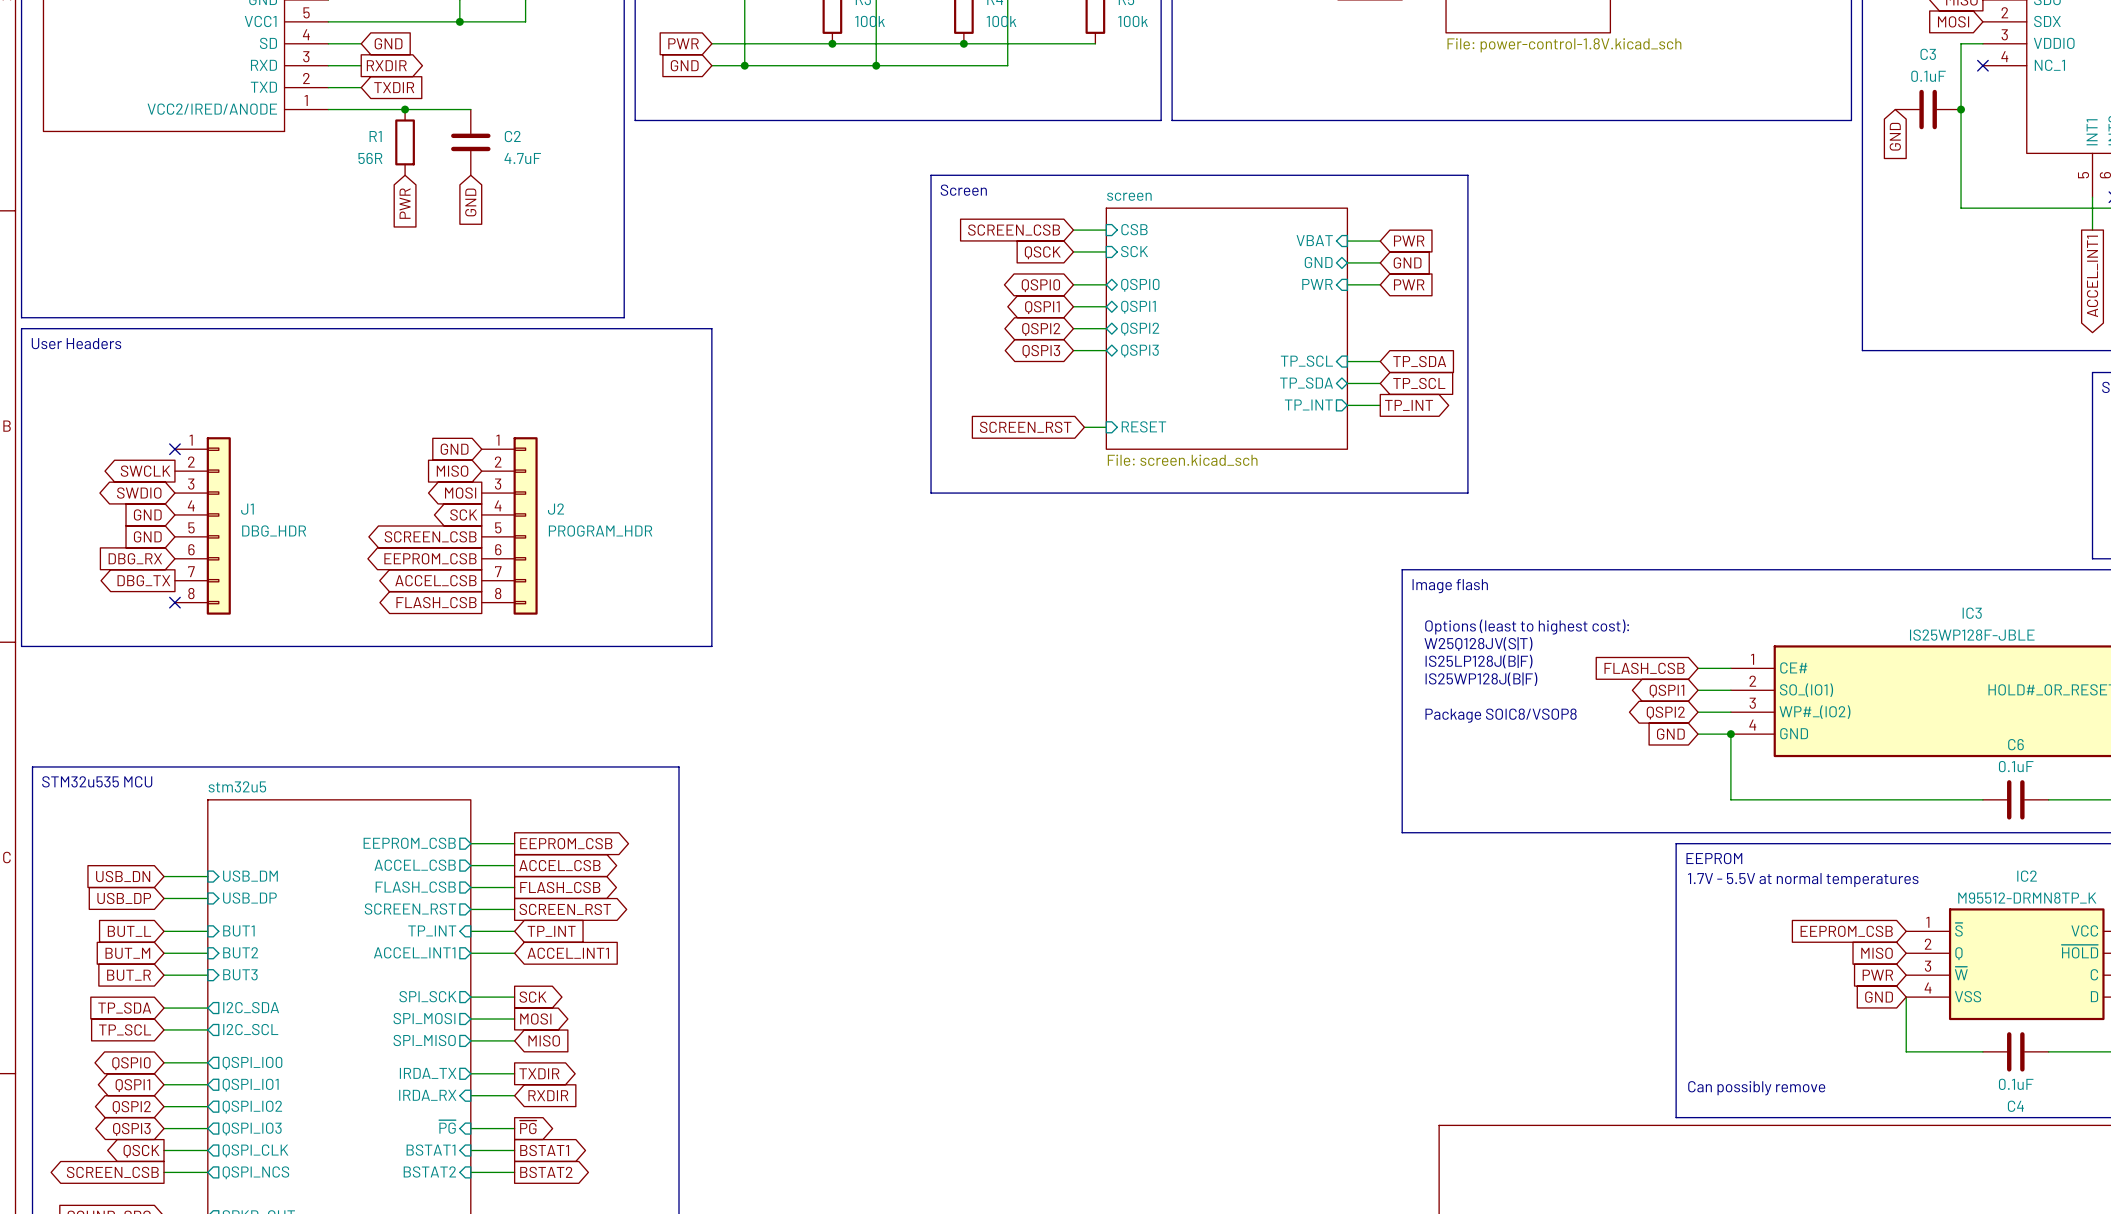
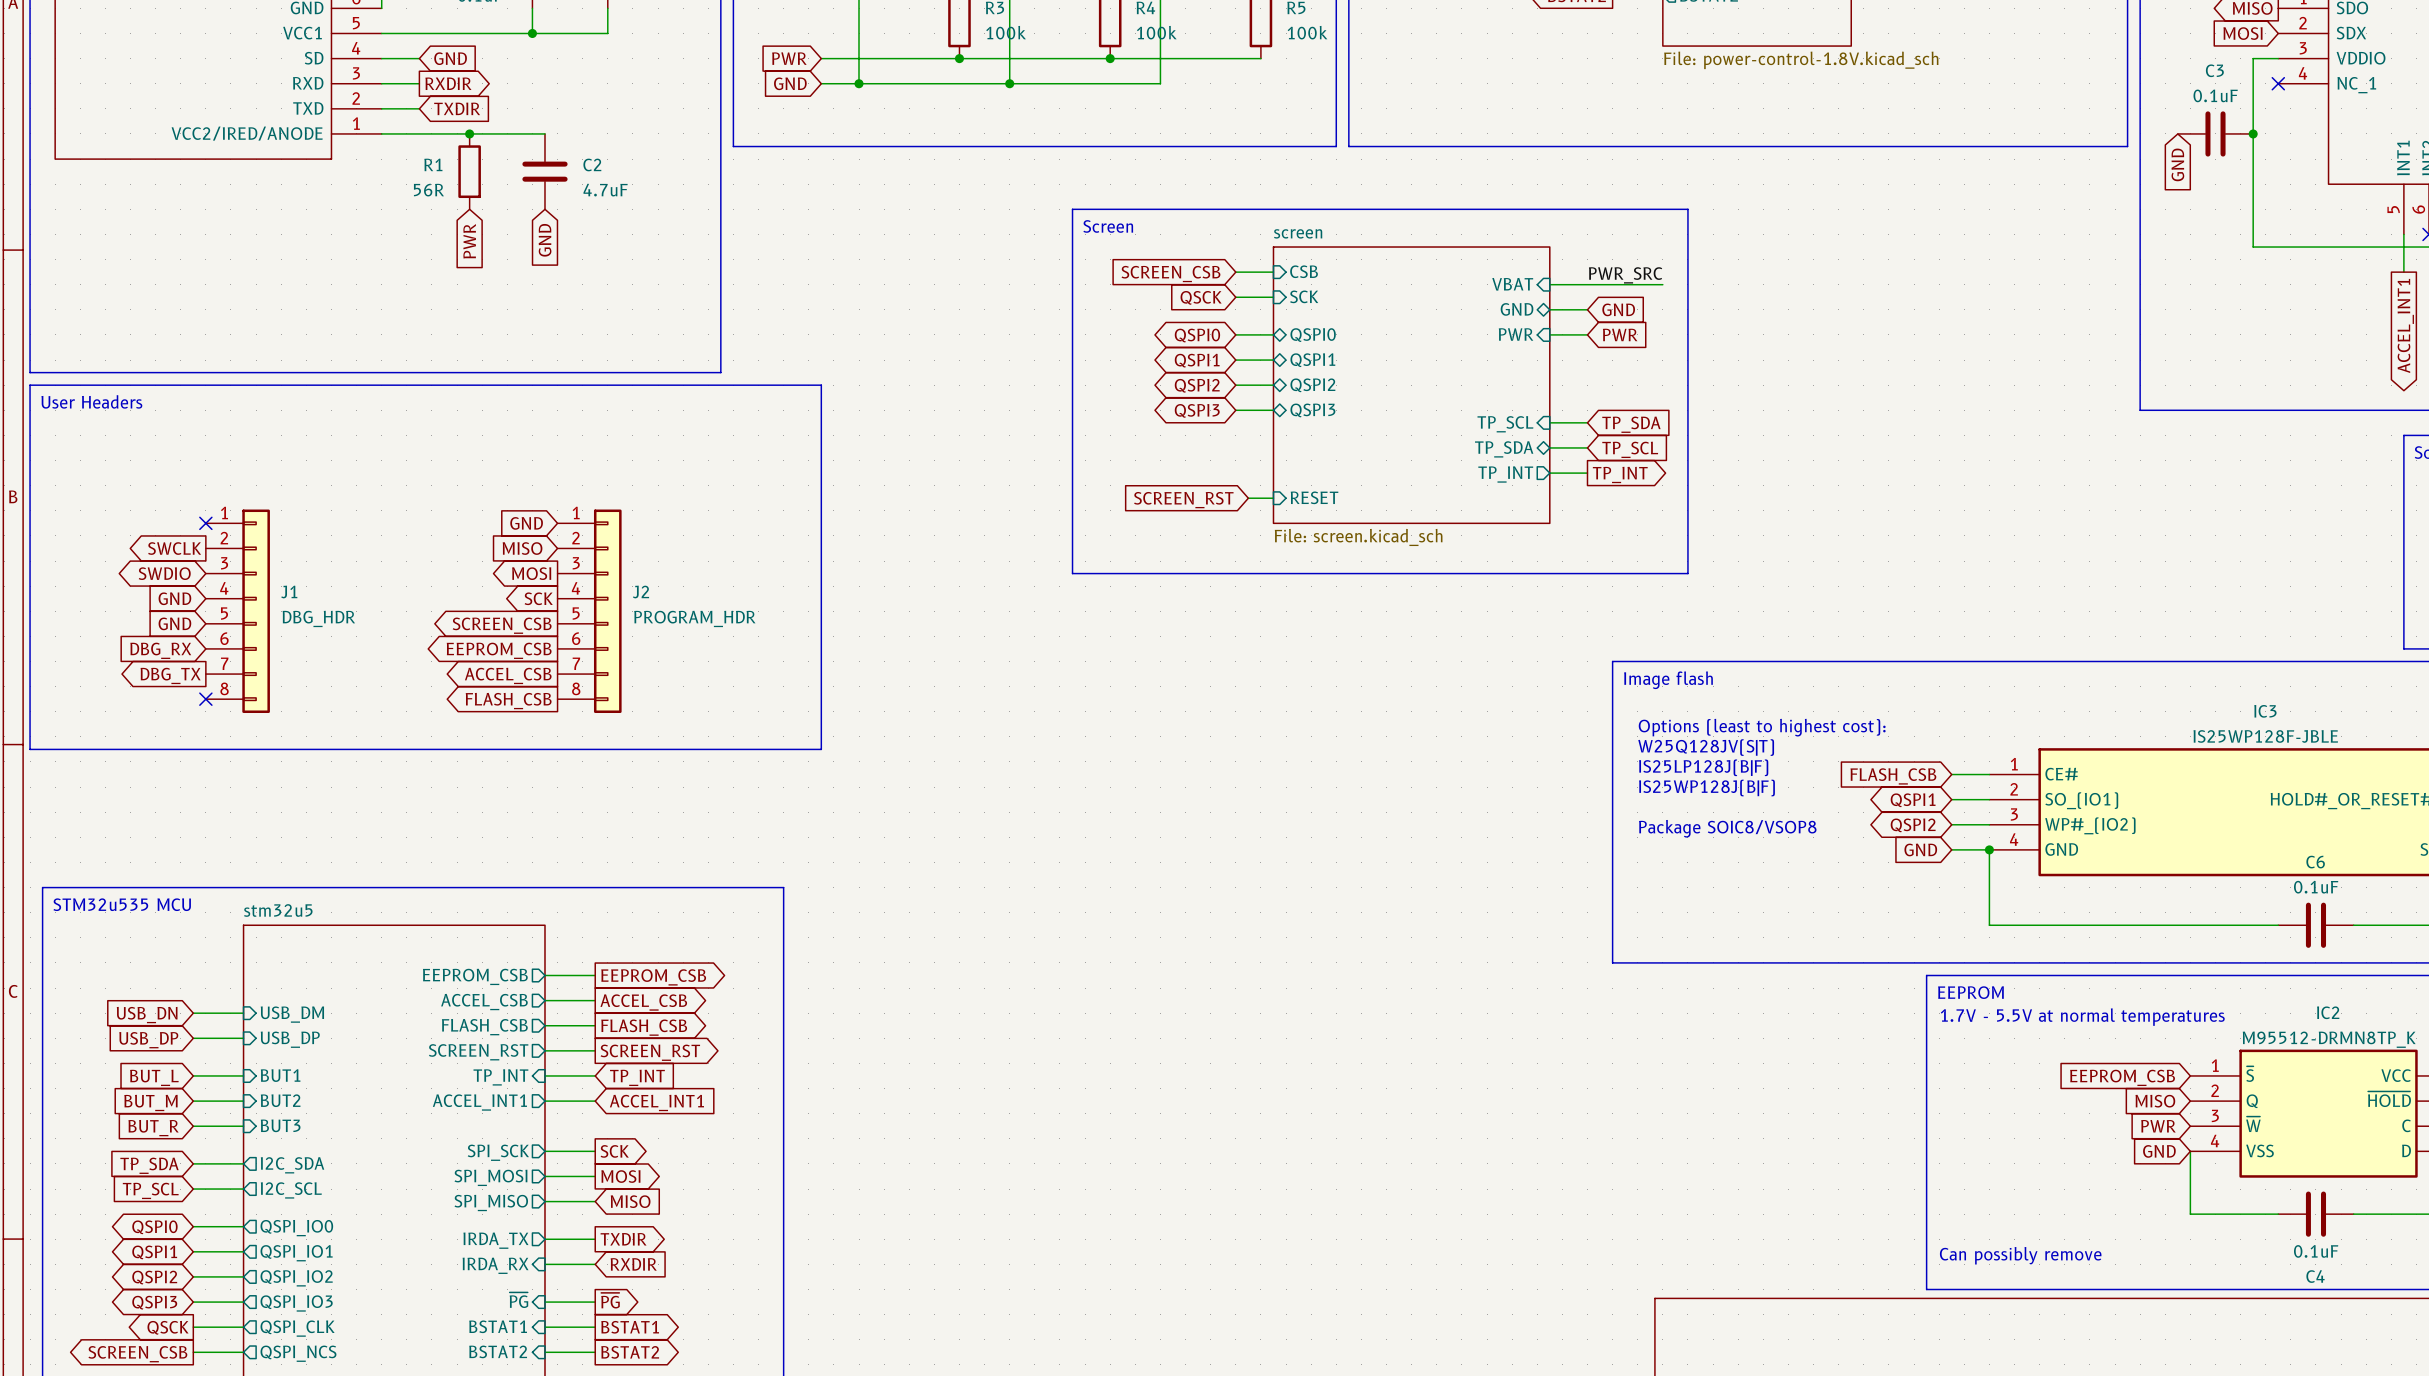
label: none -> PWR_SRC (1625, 275)
wire: none -> (1587, 284) (1662, 284)
global label: PWR (1409, 241) -> none

